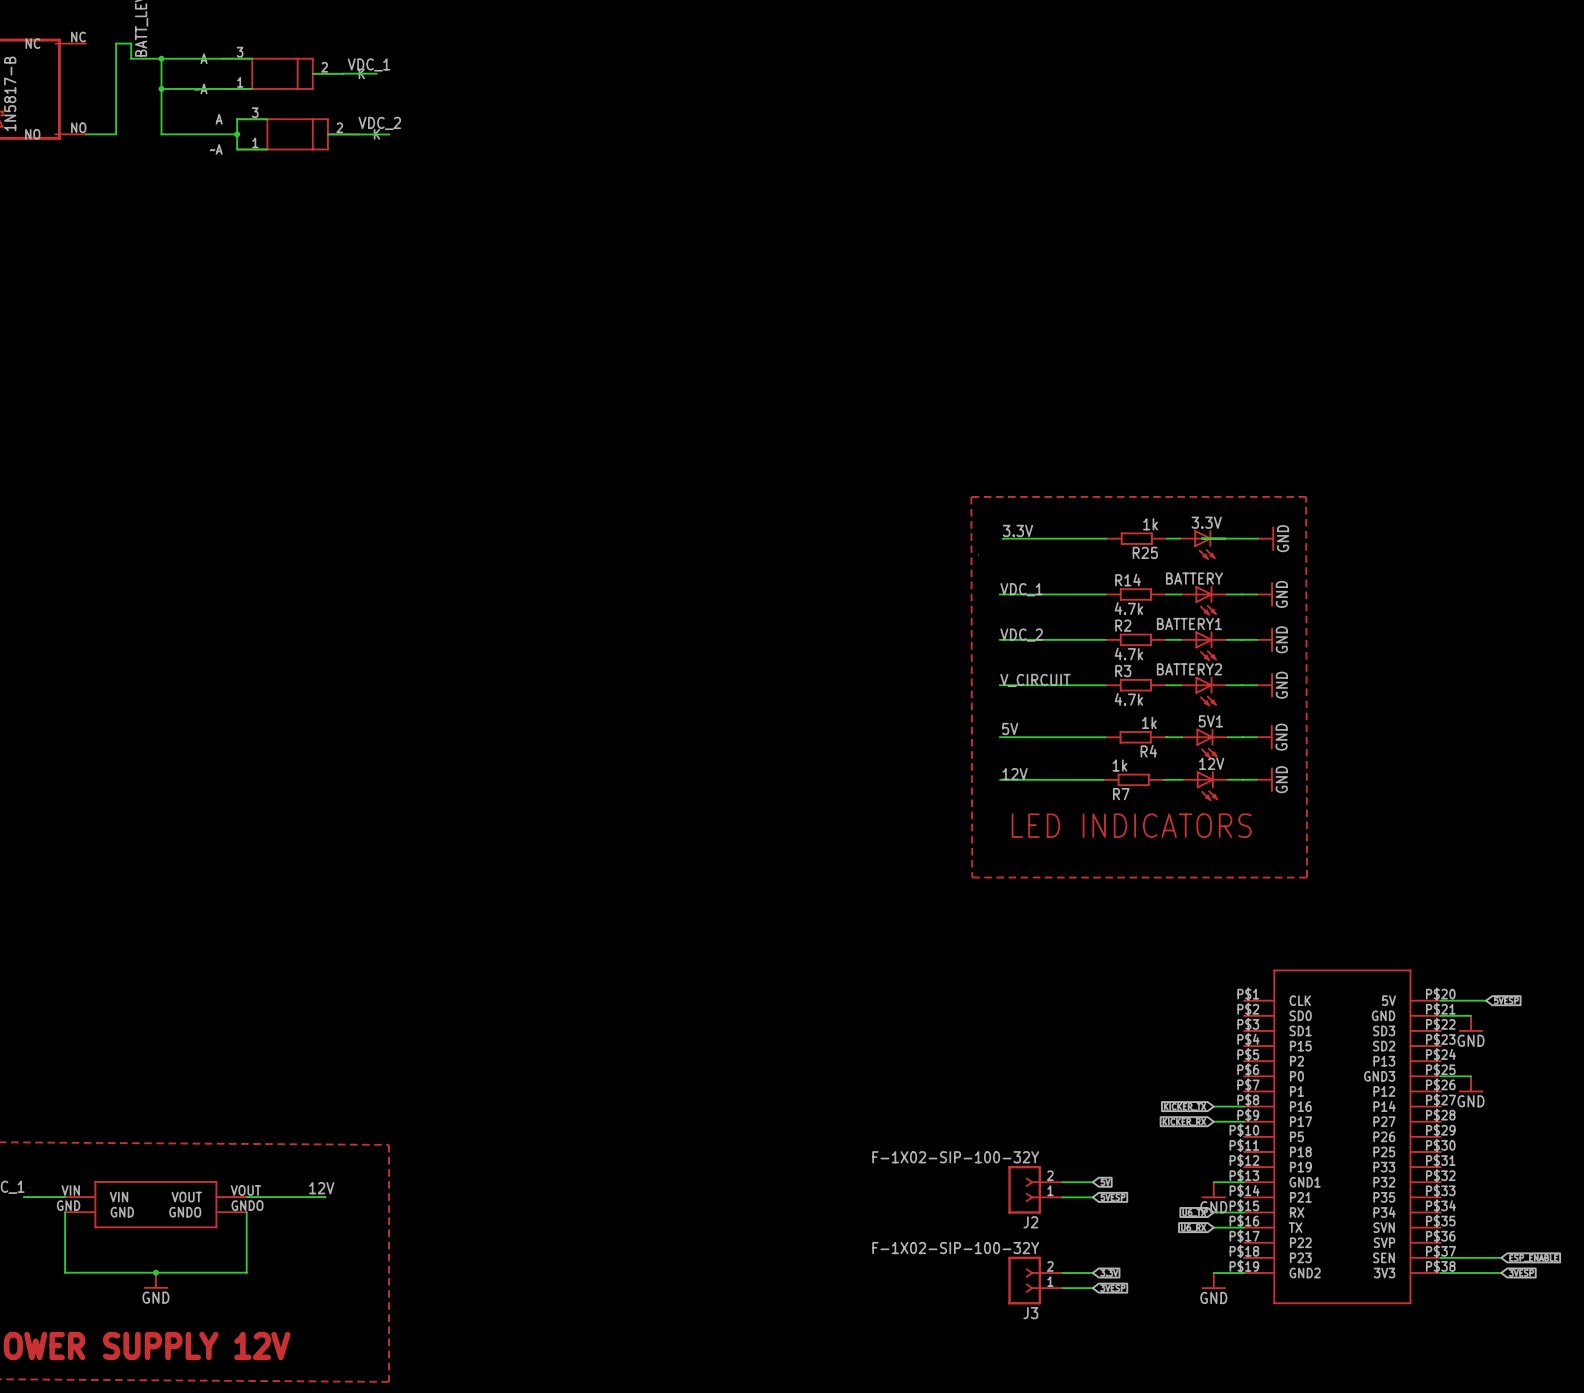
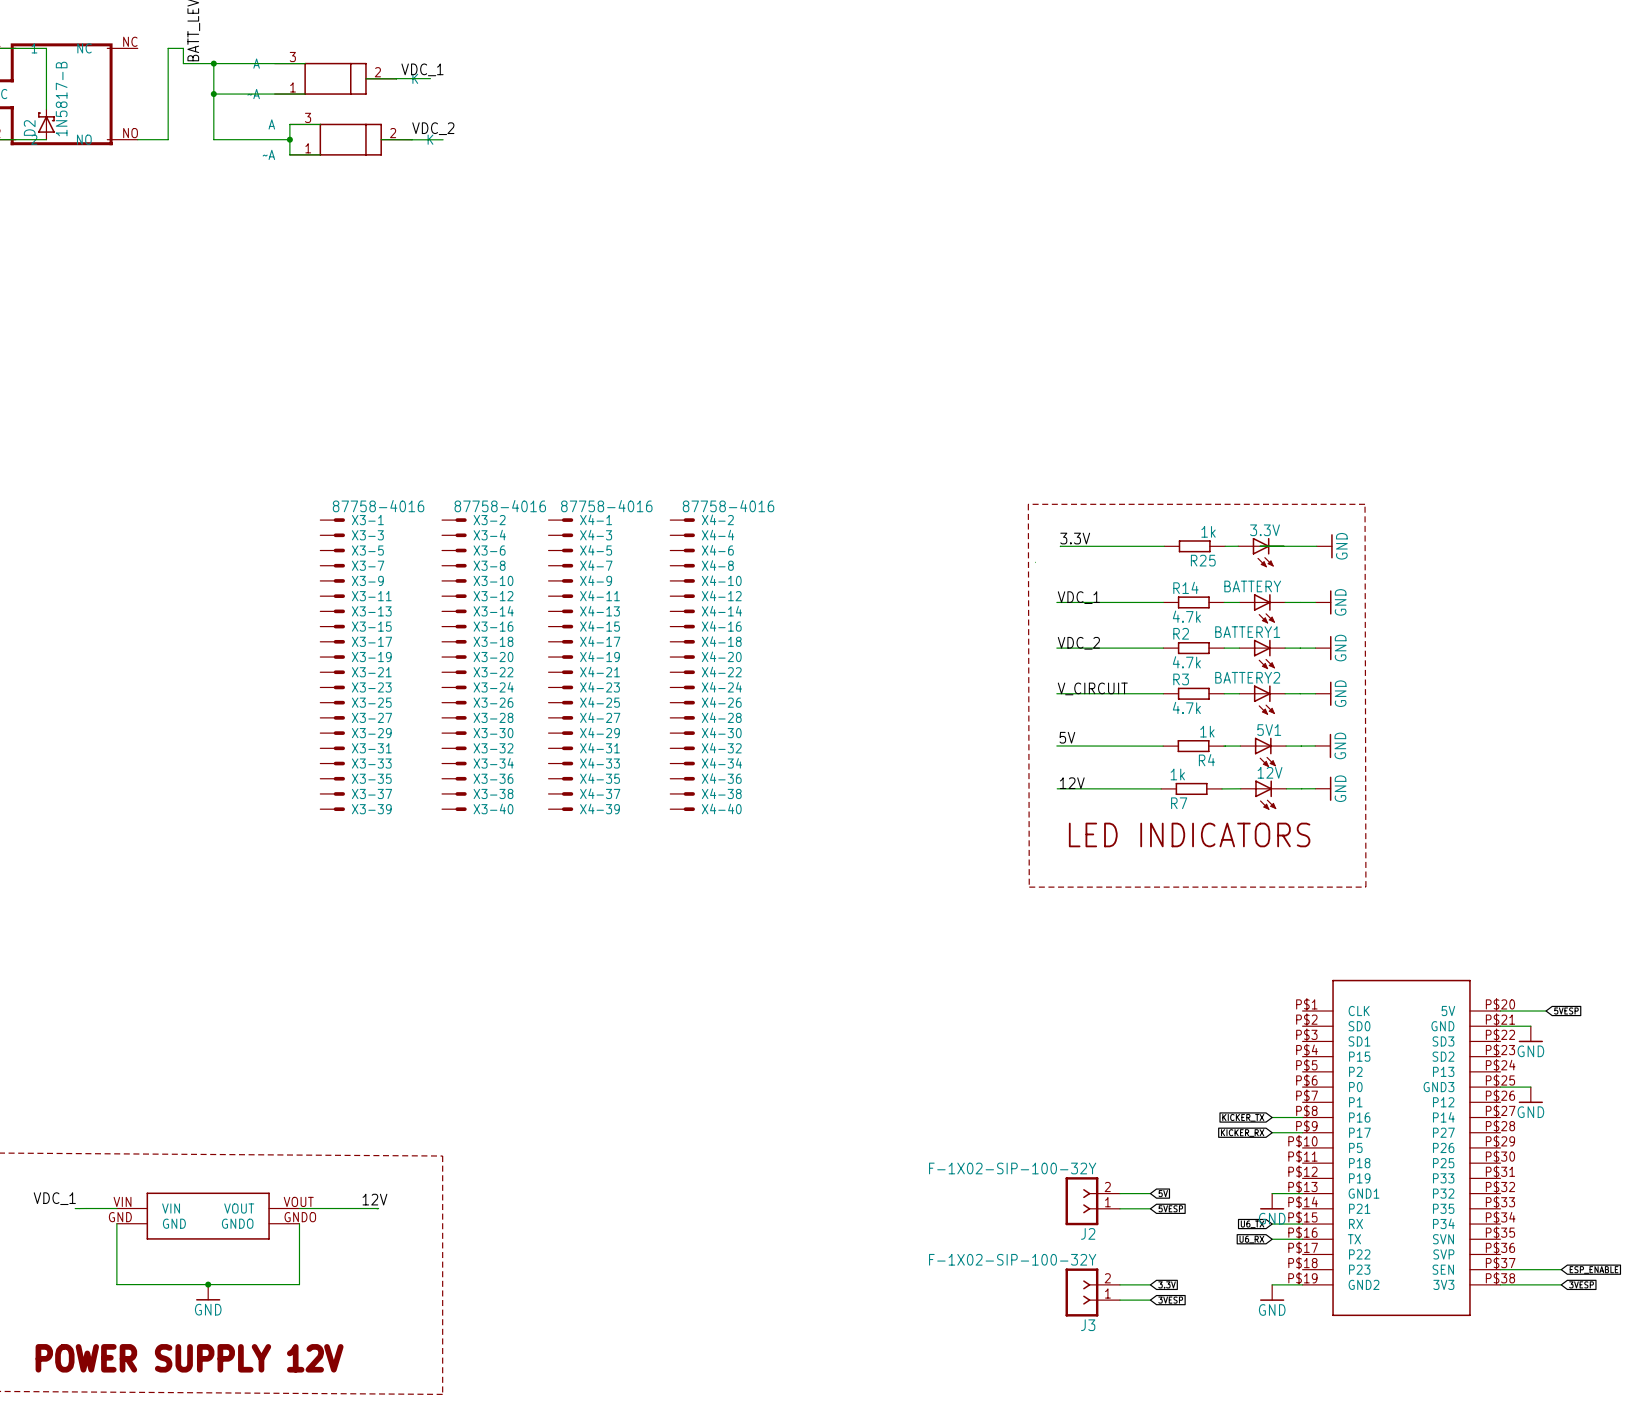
X3-1: none -> 87758-4016 (332, 520)
X3-2: none -> 87758-4016 (454, 520)
X4-1: none -> 87758-4016 (560, 520)
X4-2: none -> 87758-4016 (682, 520)
X3-3: none -> (332, 535)
X3-4: none -> (454, 535)
X4-3: none -> (560, 535)
X4-4: none -> (682, 535)
X3-5: none -> (332, 550)
X3-6: none -> (454, 550)
X4-5: none -> (560, 550)
X4-6: none -> (682, 550)
X3-7: none -> (332, 565)
X3-8: none -> (454, 565)
X4-7: none -> (560, 565)
X4-8: none -> (682, 565)
X3-9: none -> (332, 580)
X3-10: none -> (454, 580)
X4-9: none -> (560, 580)
X4-10: none -> (682, 580)
X3-11: none -> (332, 596)
X3-12: none -> (454, 596)
X4-11: none -> (560, 596)
X4-12: none -> (682, 596)
X3-13: none -> (332, 611)
X3-14: none -> (454, 611)
X4-13: none -> (560, 611)
X4-14: none -> (682, 611)
X3-15: none -> (332, 626)
X3-16: none -> (454, 626)
X4-15: none -> (560, 626)
X4-16: none -> (682, 626)
X3-17: none -> (332, 641)
X3-18: none -> (454, 641)
X4-17: none -> (560, 641)
X4-18: none -> (682, 641)
X3-19: none -> (332, 657)
X3-20: none -> (454, 657)
X4-19: none -> (560, 657)
X4-20: none -> (682, 657)
X3-21: none -> (332, 672)
X3-22: none -> (454, 672)
X4-21: none -> (560, 672)
X4-22: none -> (682, 672)
X3-23: none -> (332, 687)
X3-24: none -> (454, 687)
X4-23: none -> (560, 687)
X4-24: none -> (682, 687)
X3-25: none -> (332, 702)
X3-26: none -> (454, 702)
X4-25: none -> (560, 702)
X4-26: none -> (682, 702)
X3-27: none -> (332, 717)
X3-28: none -> (454, 717)
X4-27: none -> (560, 717)
X4-28: none -> (682, 717)
X3-29: none -> (332, 733)
X3-30: none -> (454, 733)
X4-29: none -> (560, 733)
X4-30: none -> (682, 733)
X3-31: none -> (332, 748)
X3-32: none -> (454, 748)
X4-31: none -> (560, 748)
X4-32: none -> (682, 748)
X3-33: none -> (332, 763)
X3-34: none -> (454, 763)
X4-33: none -> (560, 763)
X4-34: none -> (682, 763)
X3-35: none -> (332, 778)
X3-36: none -> (454, 778)
X4-35: none -> (560, 778)
X4-36: none -> (682, 778)
X3-37: none -> (332, 793)
X3-38: none -> (454, 793)
X4-37: none -> (560, 793)
X4-38: none -> (682, 793)
X3-39: none -> (332, 809)
X3-40: none -> (454, 809)
X4-39: none -> (560, 809)
X4-40: none -> (682, 809)

